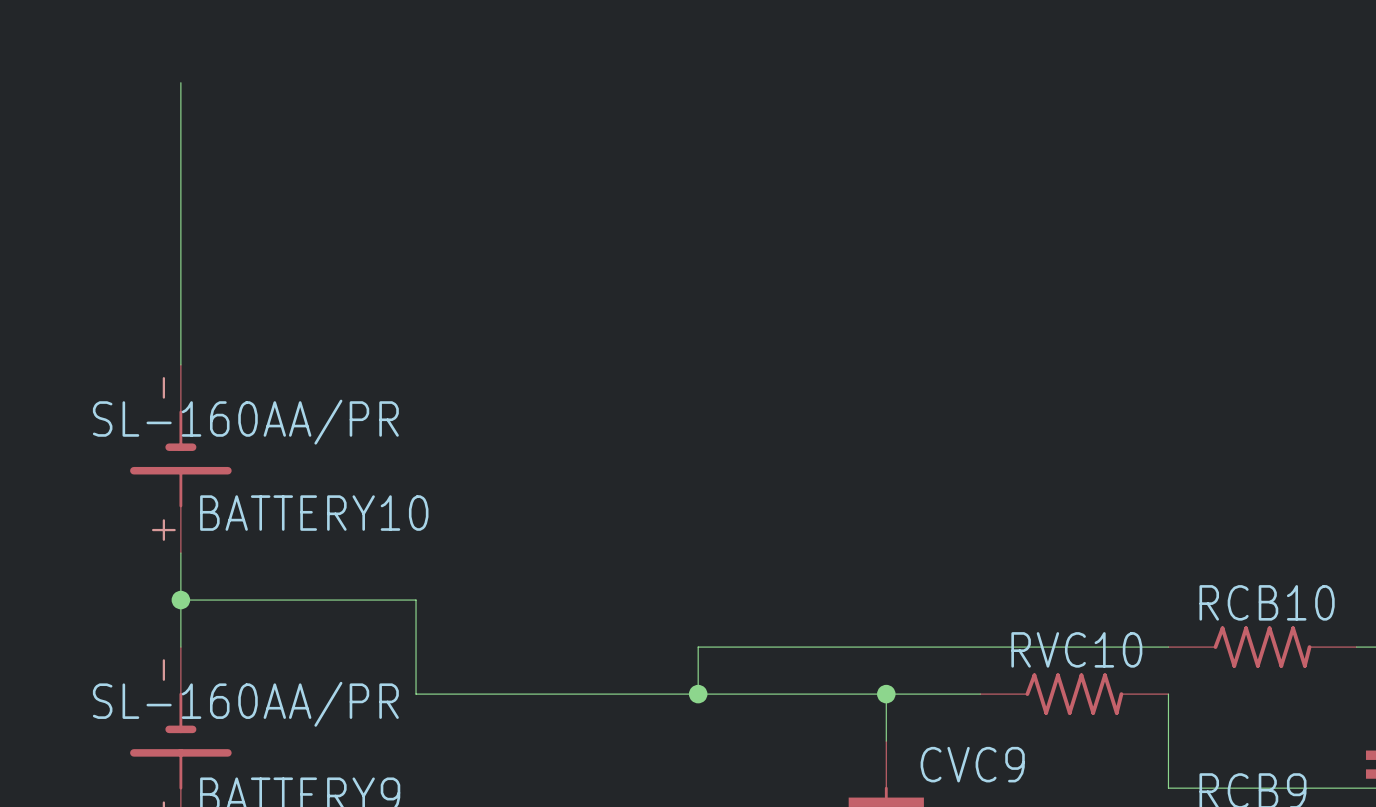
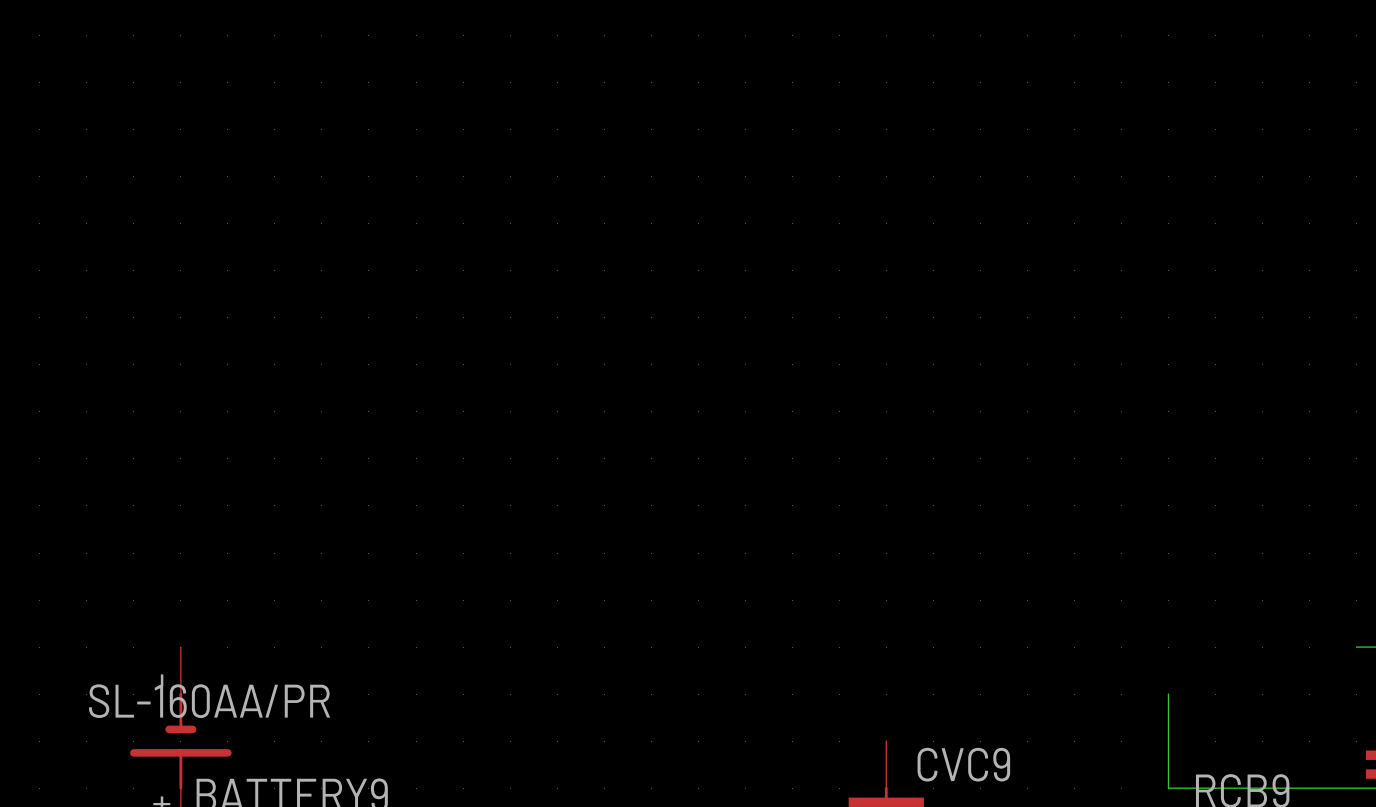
wire: (180, 82) (180, 364) -> none
BATTERY10: SL-160AA/PR (180, 458) -> none
wire: (180, 553) (180, 647) -> none
wire: (180, 600) (416, 600) (416, 694) (980, 694) -> none
junction: (180, 600) -> none
wire: (1168, 647) (698, 647) (698, 694) -> none
RCB10: (1262, 647) -> none
junction: (698, 694) -> none
wire: (886, 694) (886, 741) -> none
junction: (886, 694) -> none
RVC10: (1074, 694) -> none

